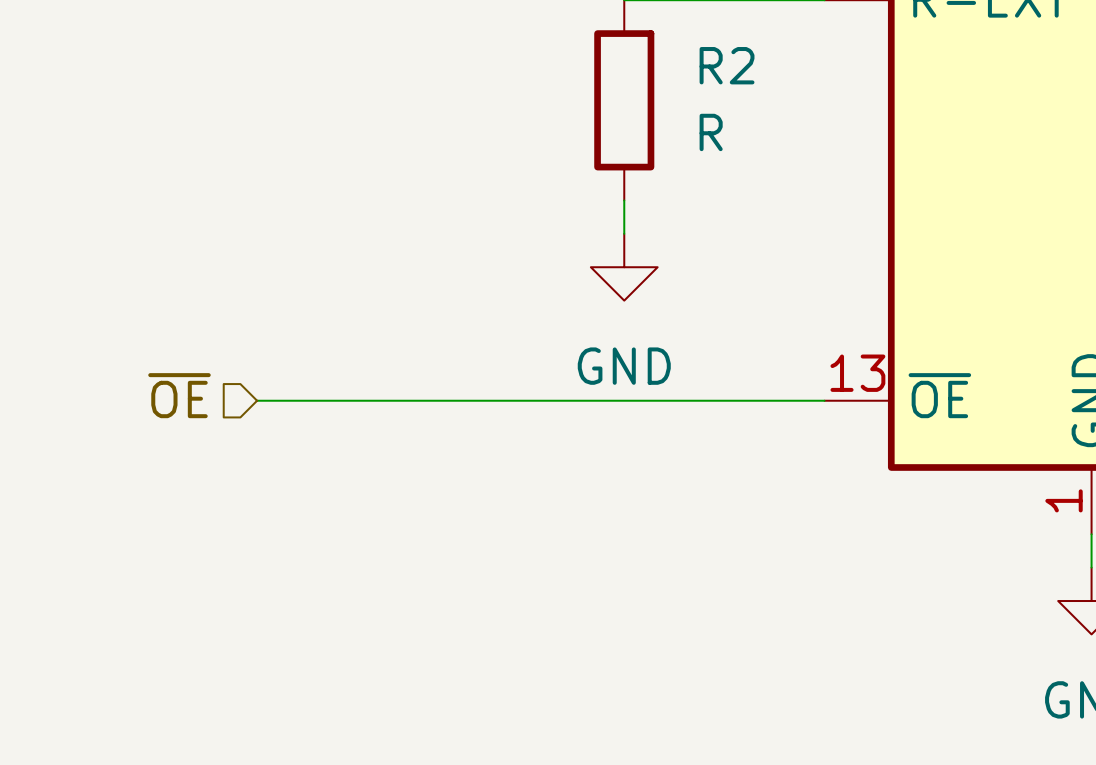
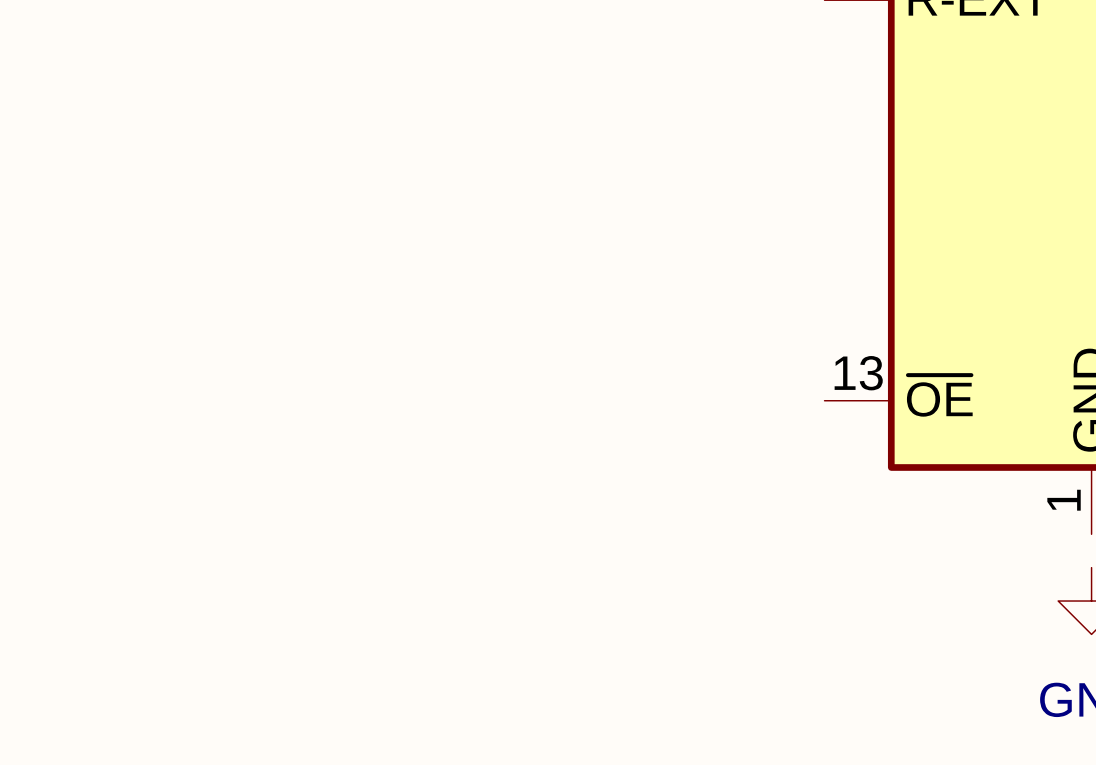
wire: (624, 0) (824, 0) -> none
R2: R (624, 100) -> none
wire: (624, 200) (624, 233) -> none
power symbol: GND (624, 267) -> none
hierarchical label: ~{OE} (179, 395) -> none
wire: (257, 400) (824, 400) -> none
wire: (1091, 534) (1091, 567) -> none

